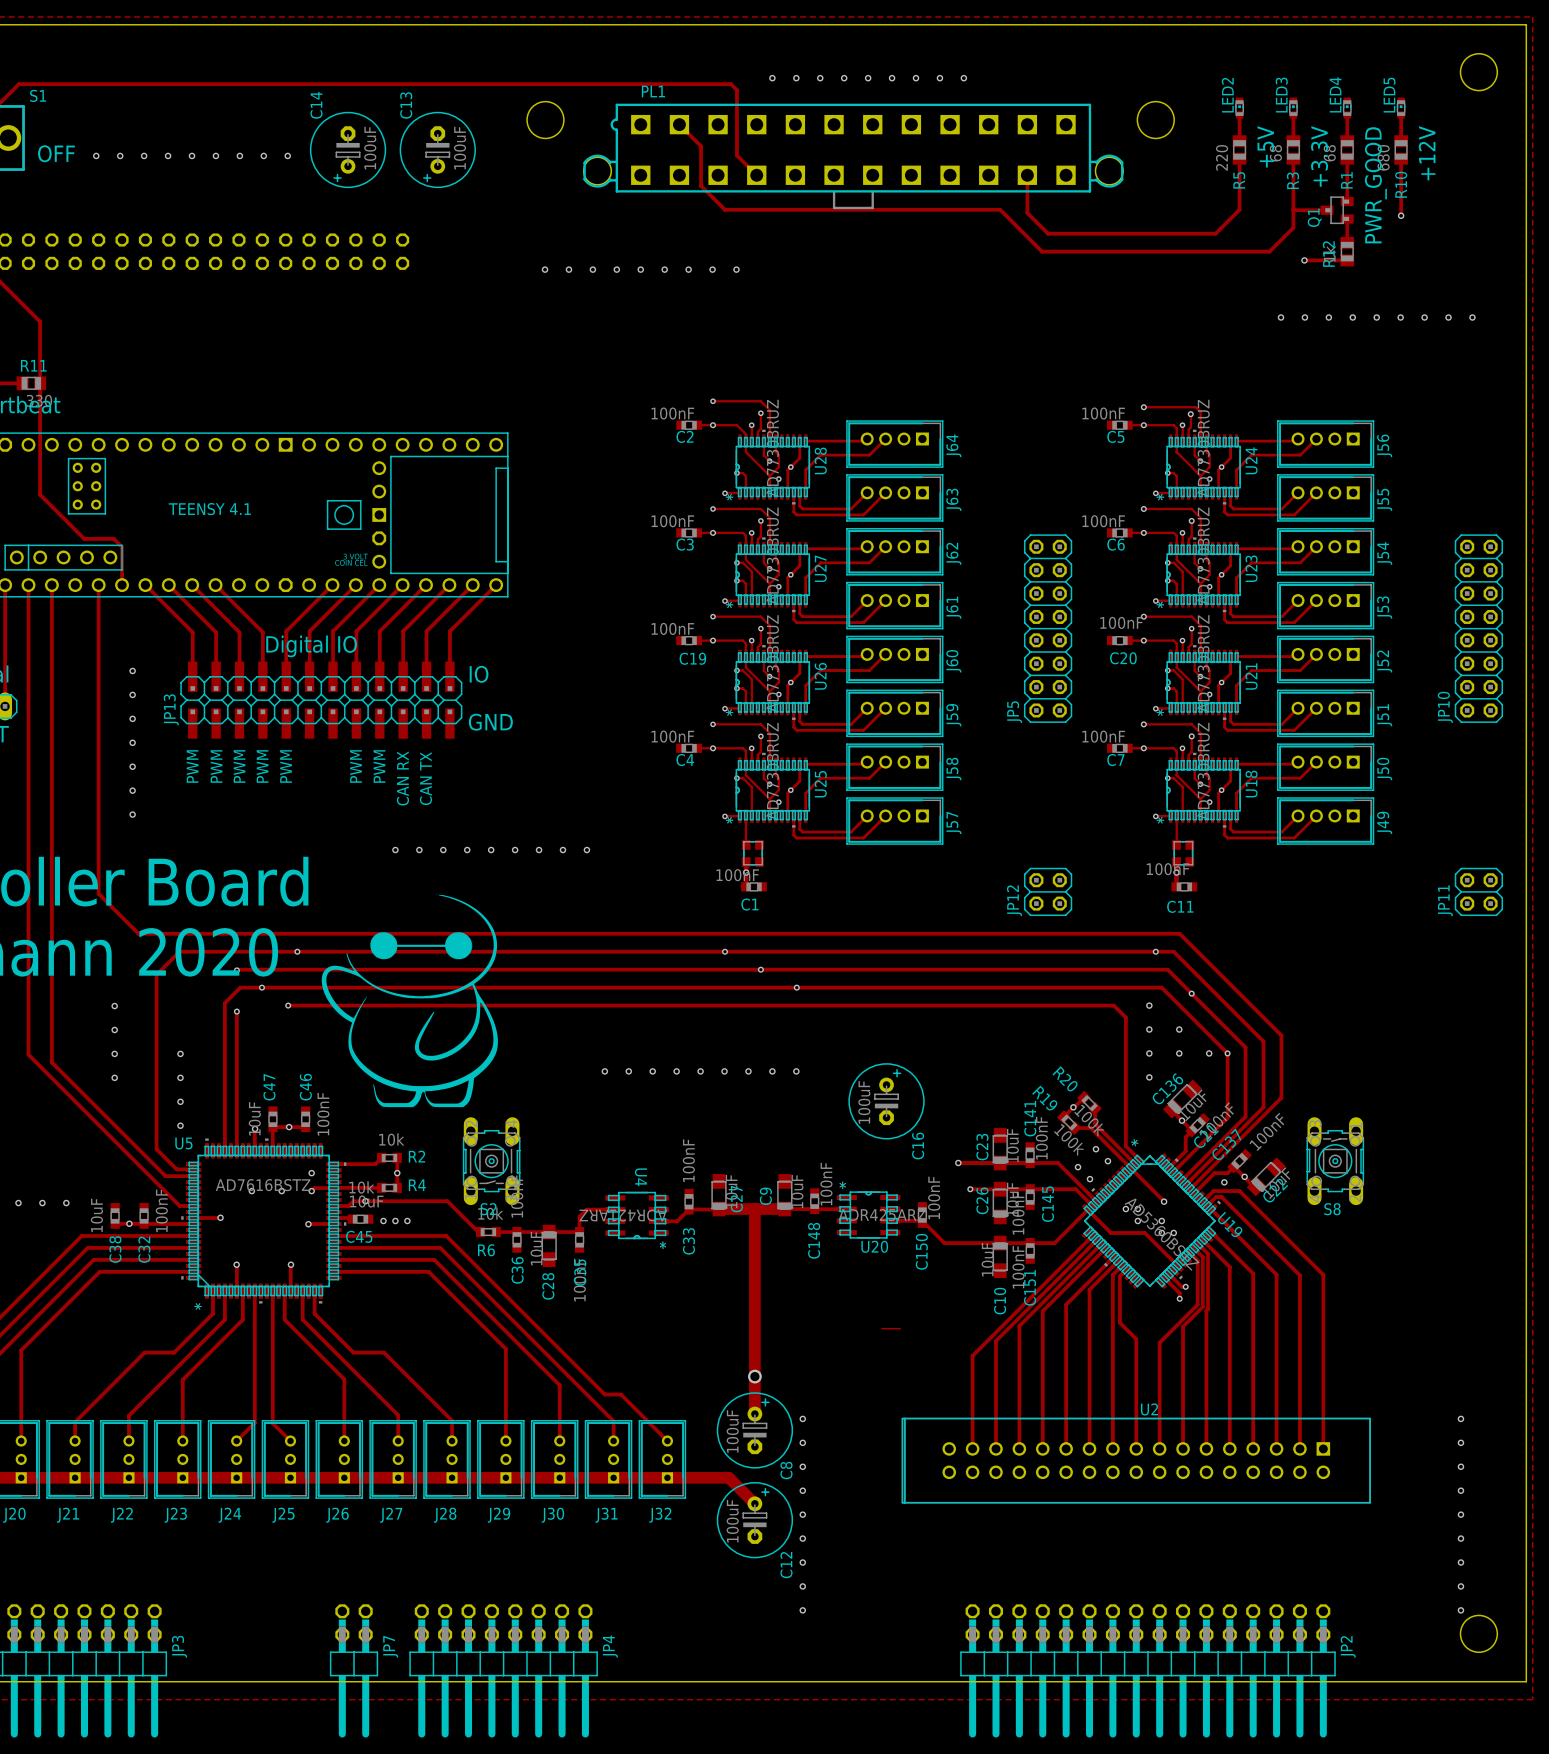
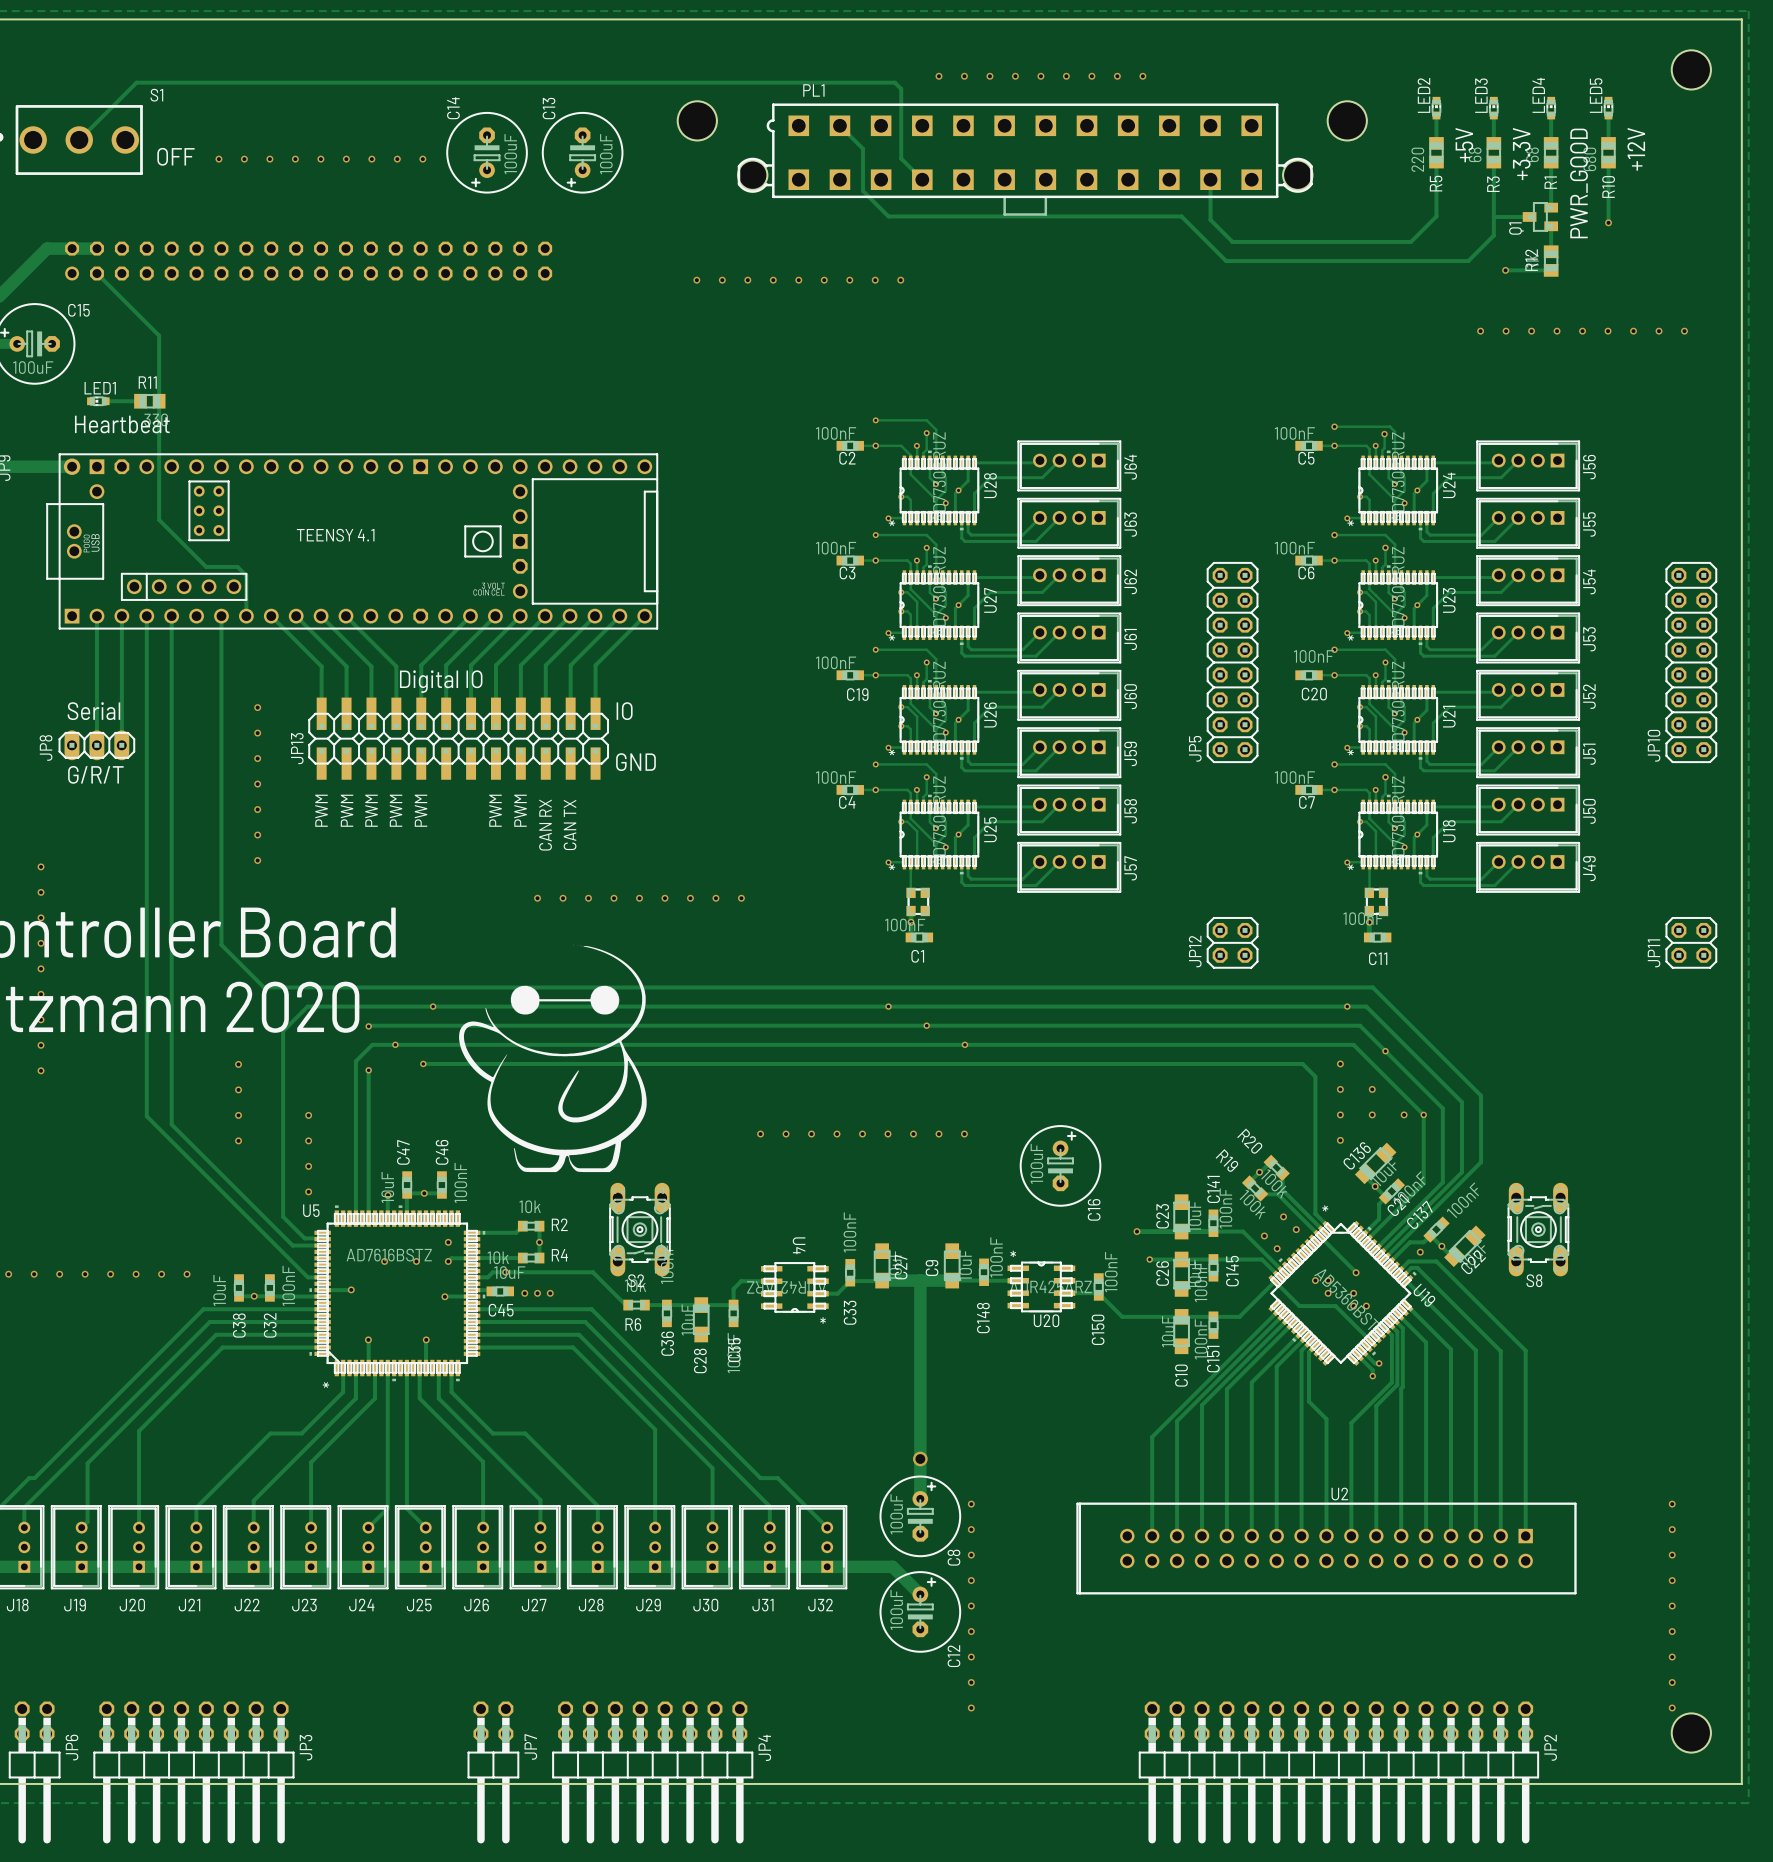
track: (881, 1328) (900, 1328) -> none

